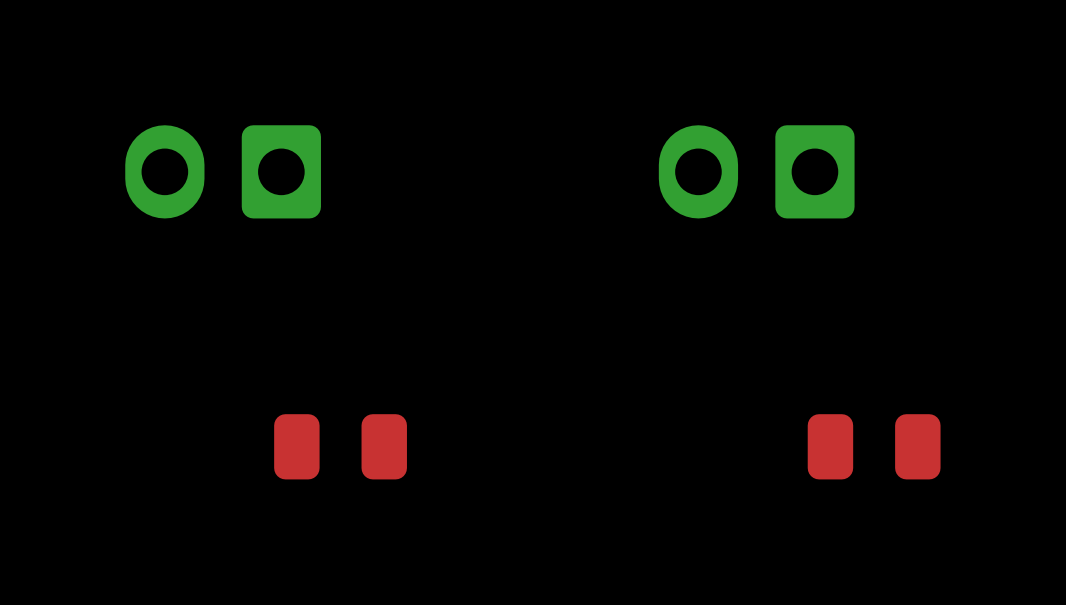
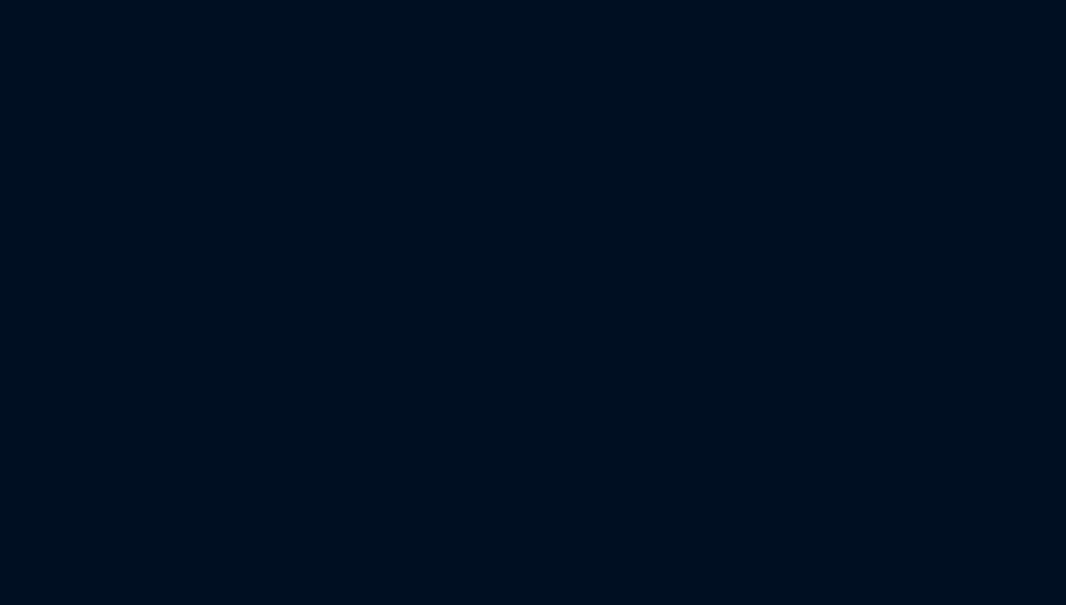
part: (223, 171) -> none
part: (756, 171) -> none
part: (340, 446) -> none
part: (874, 446) -> none

